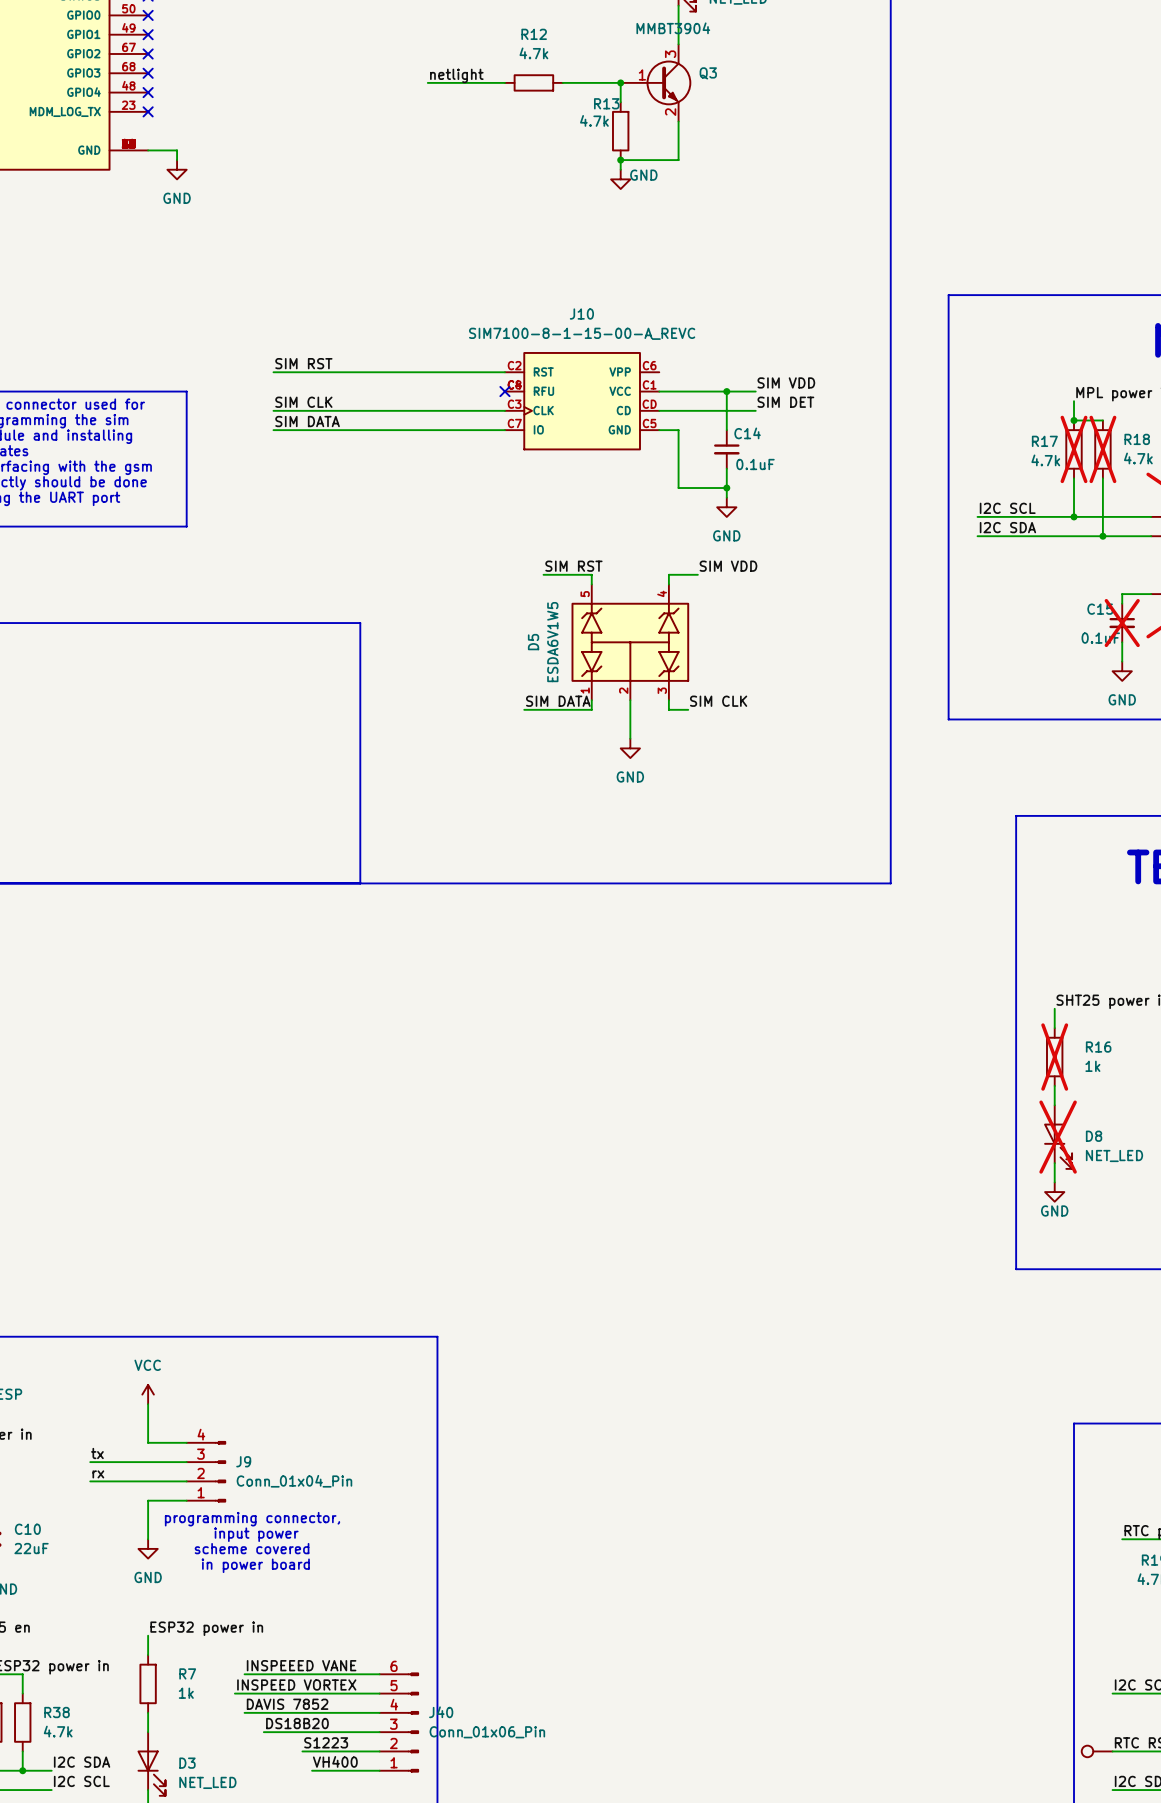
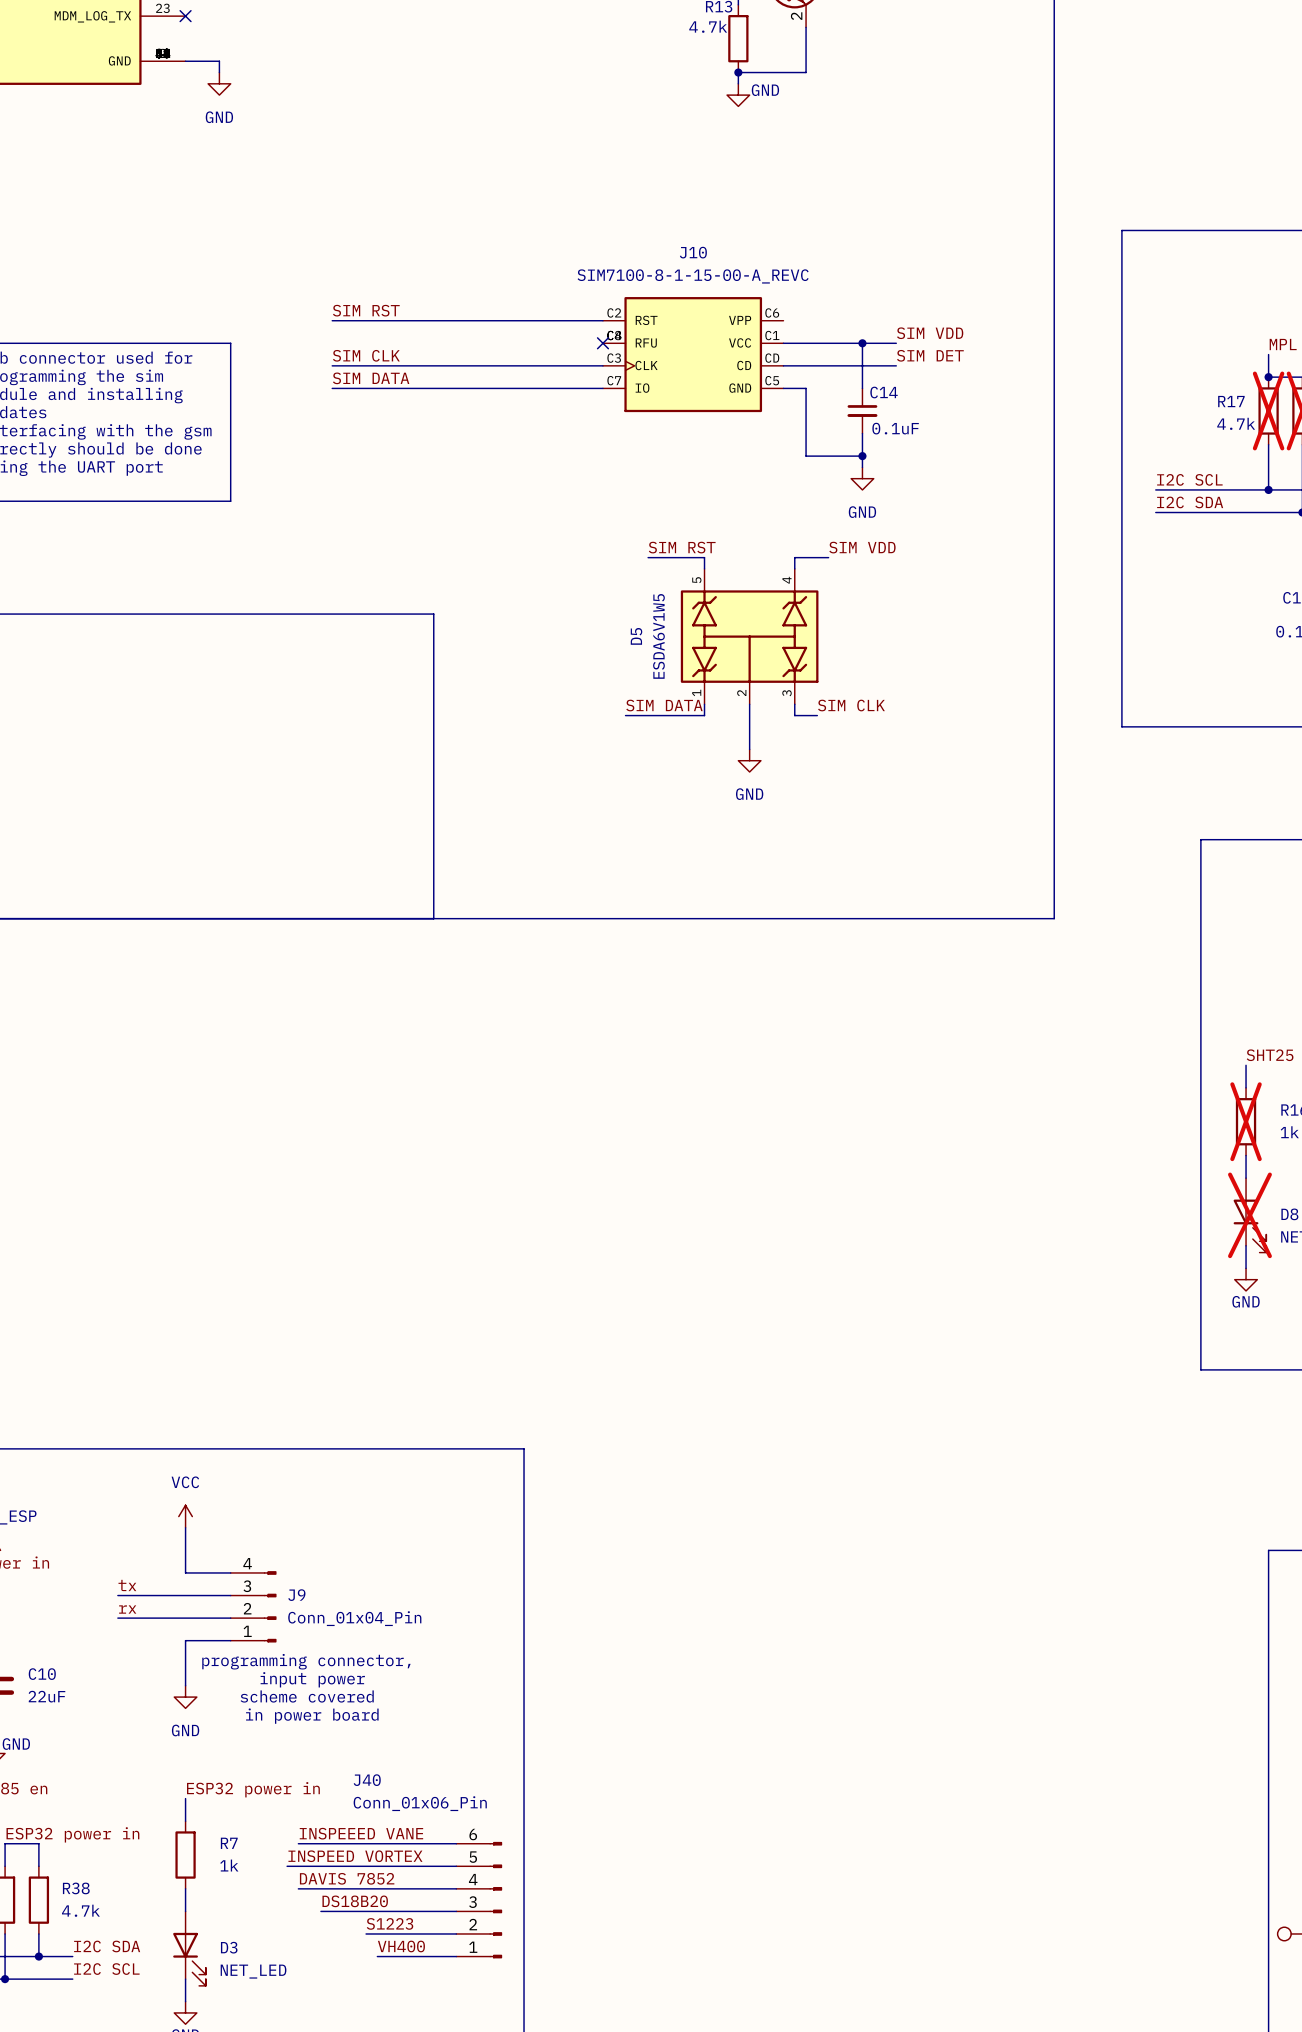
J40 name position: J40 (441, 1712) -> J40 (367, 1780)
J40 value position: Conn_01x06_Pin (487, 1732) -> Conn_01x06_Pin (420, 1803)

